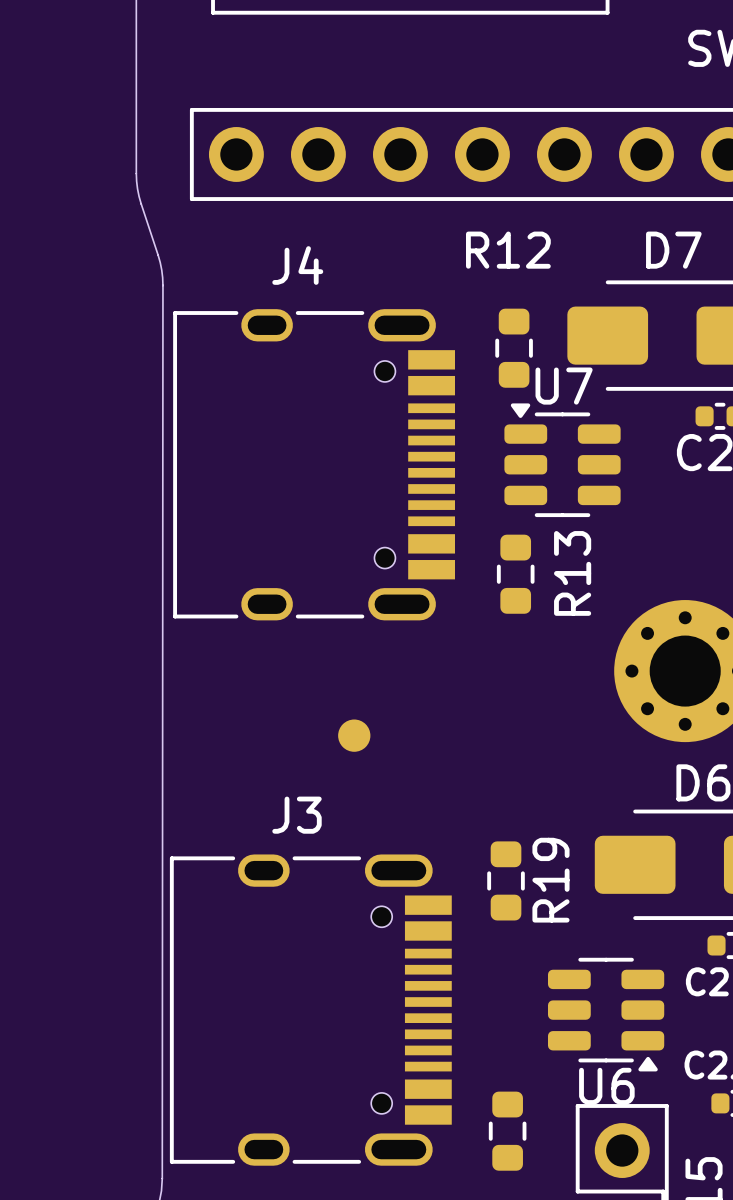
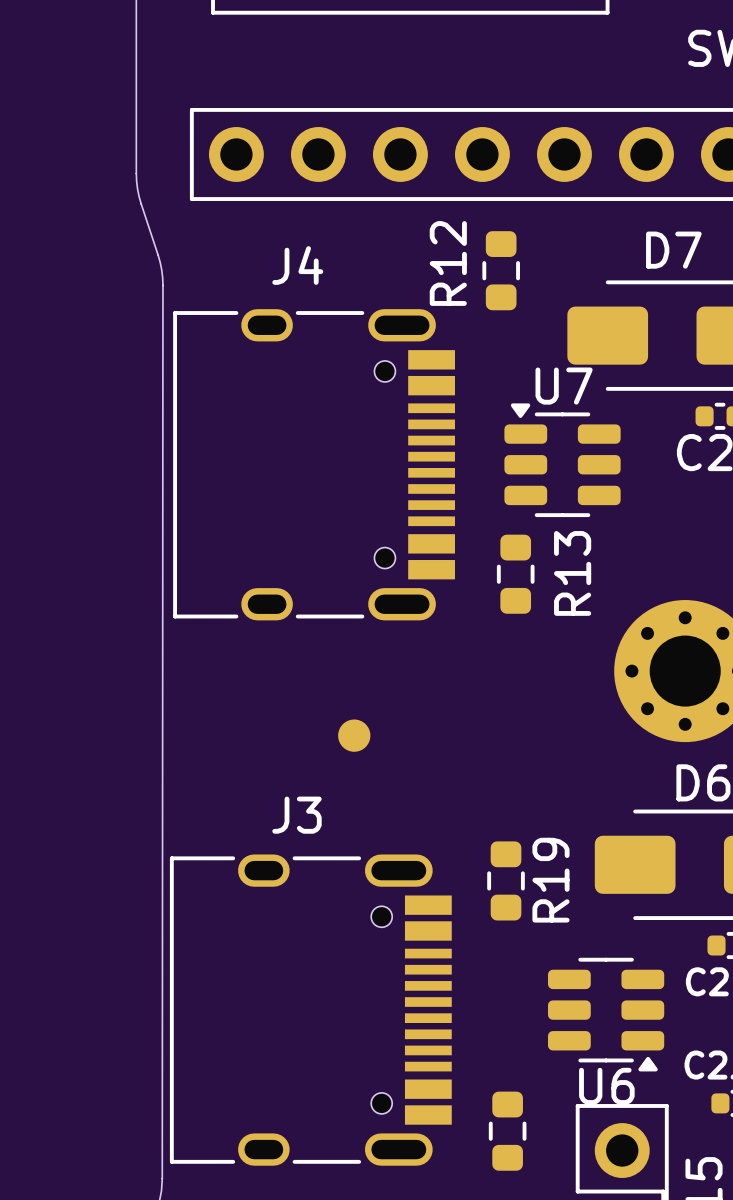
R12 name rotation: 0° (508, 250) -> 90° counterclockwise (448, 263)
R12 position: (514, 348) -> (501, 270)

